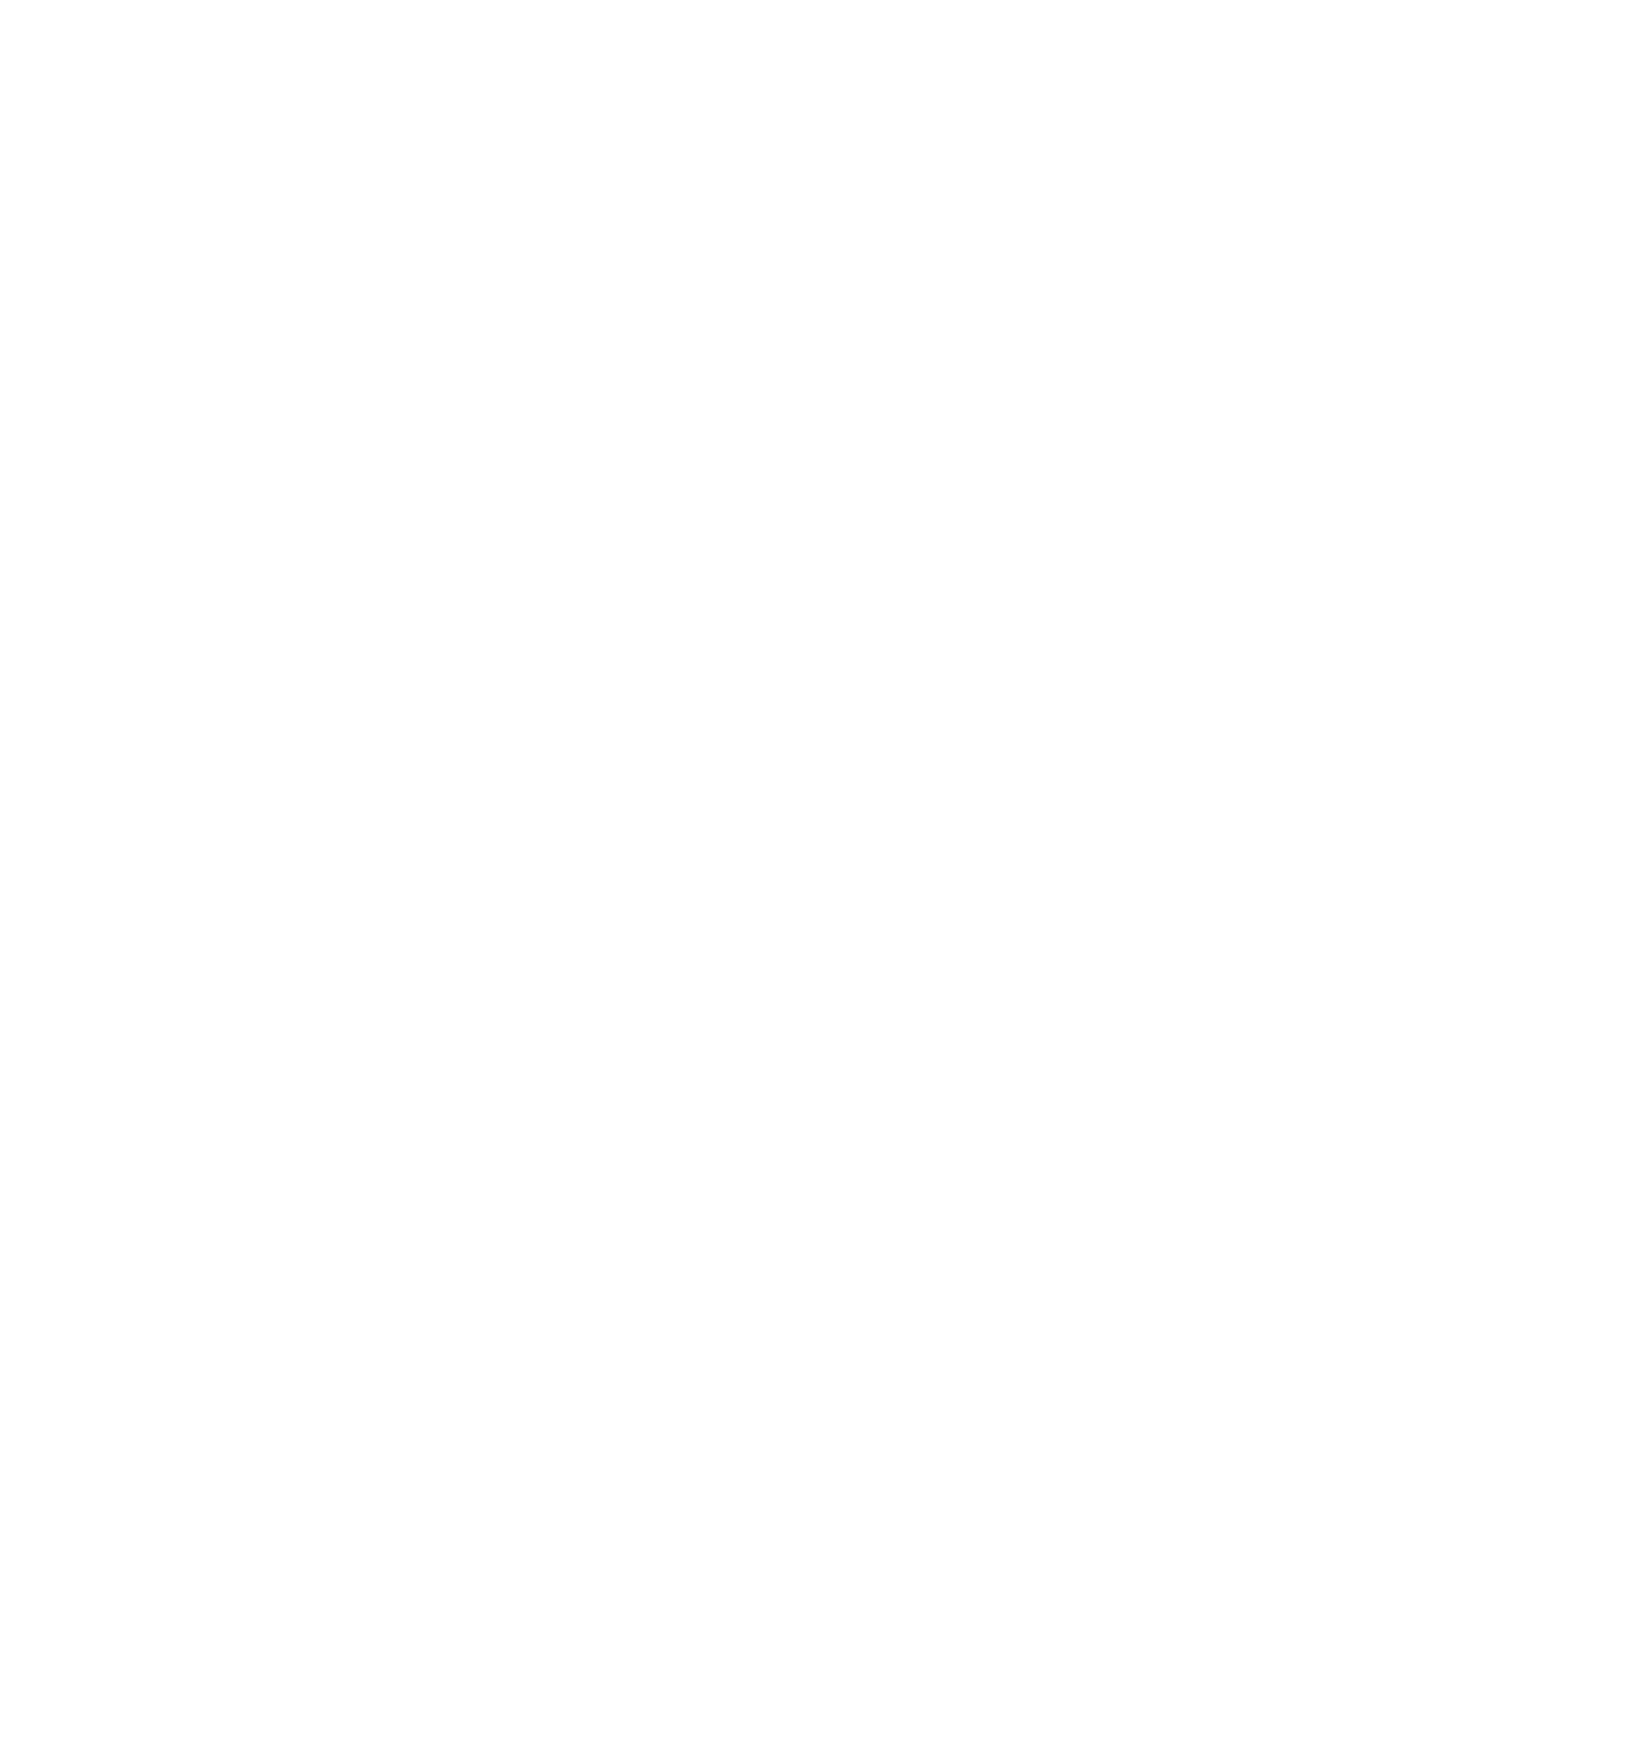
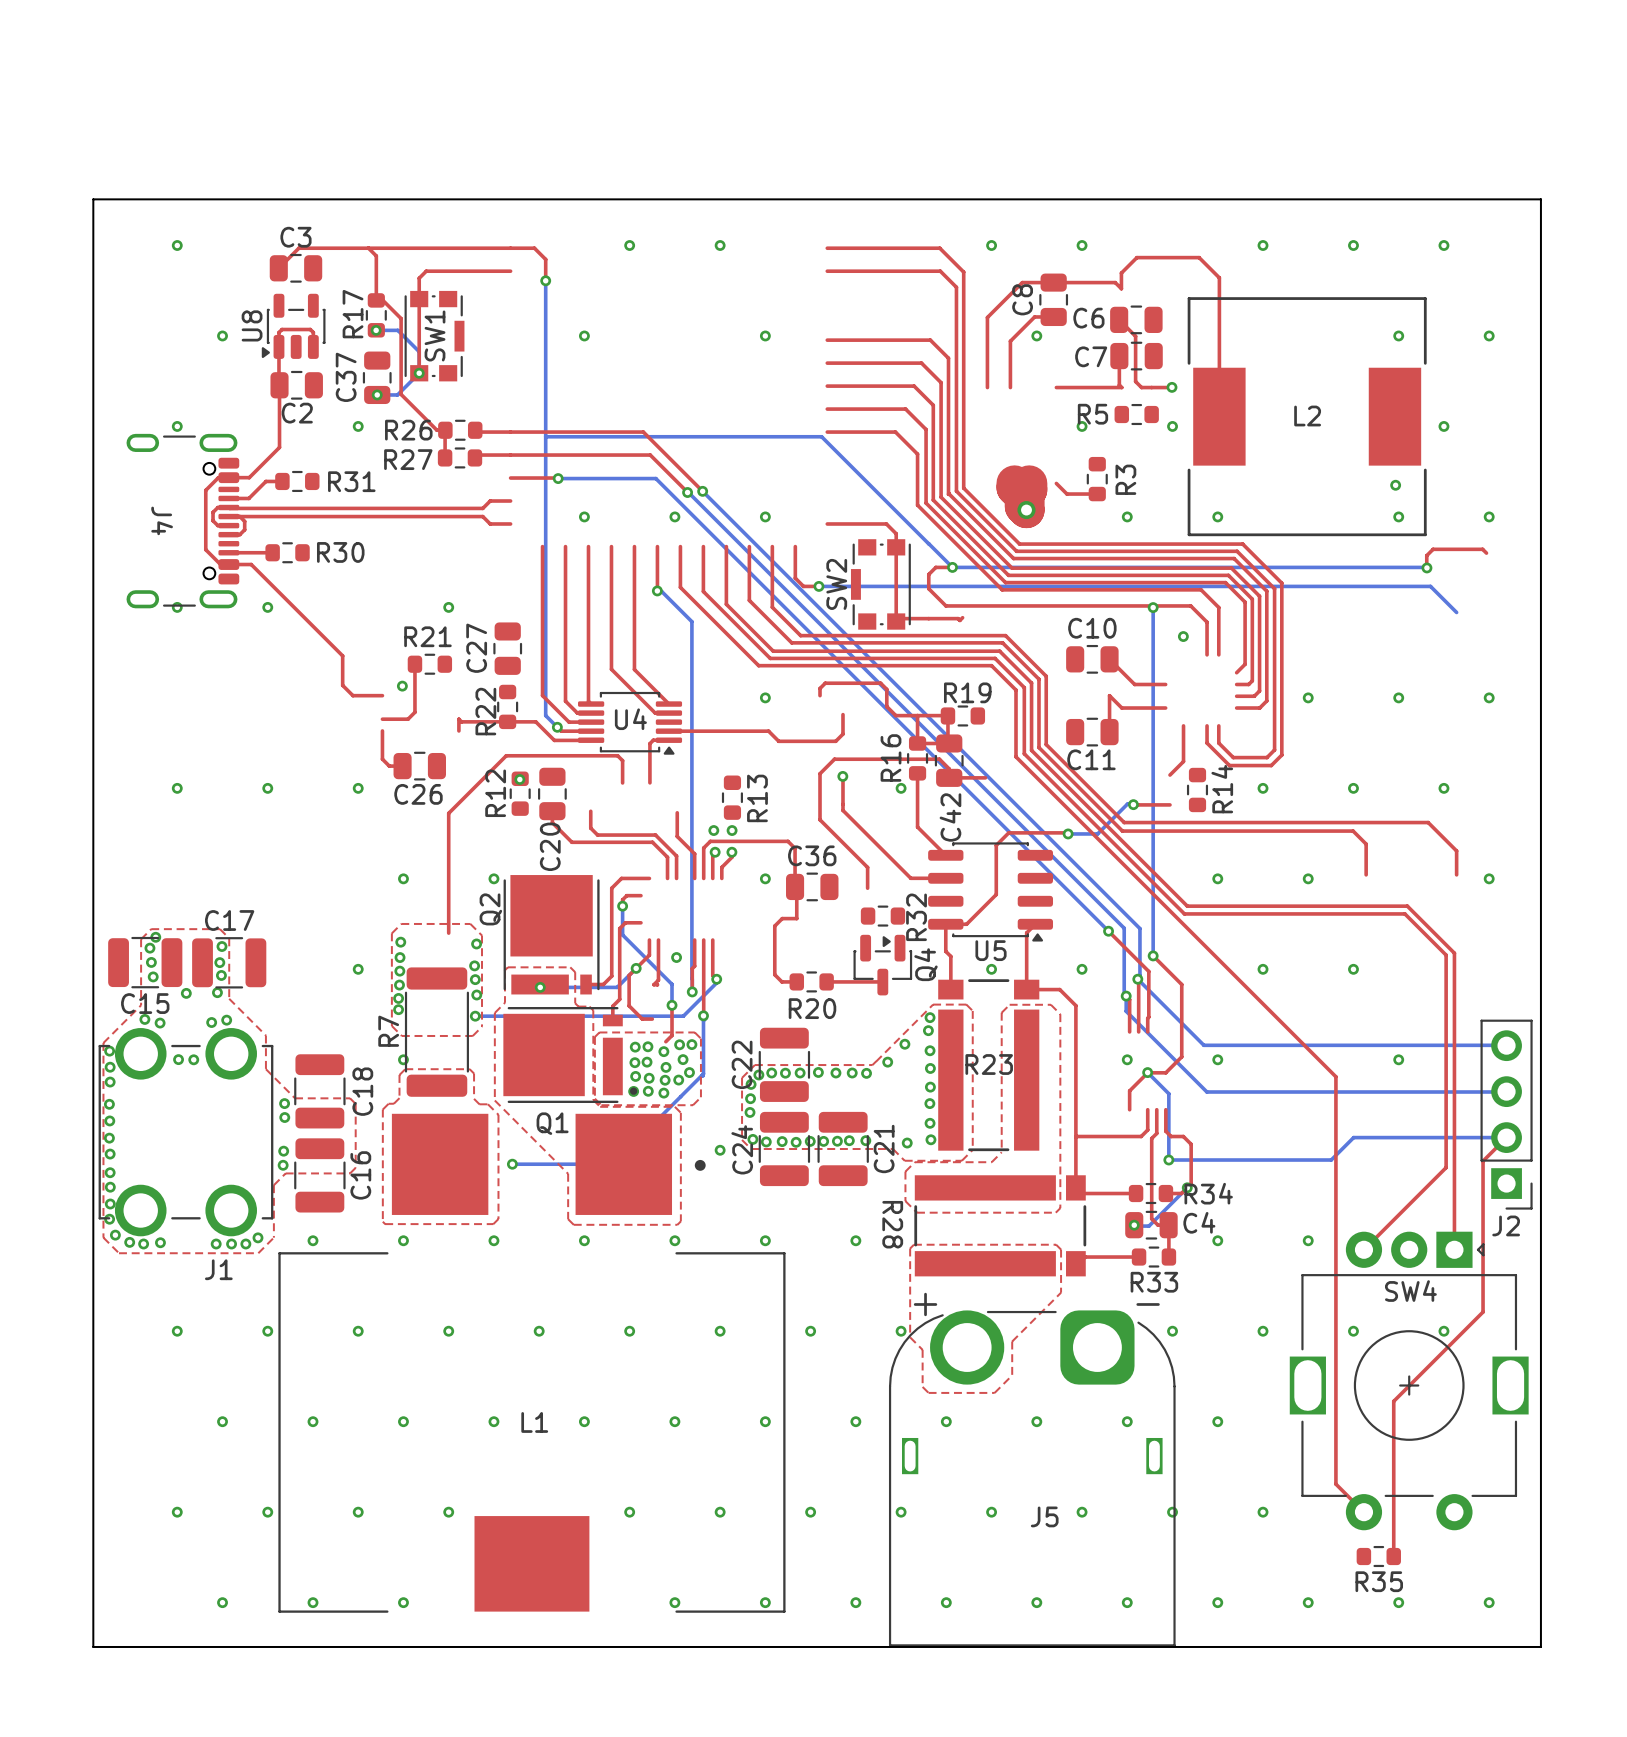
board edge: none -> (93, 199) (1540, 199) (1540, 1646) (93, 1646) (93, 199)
via: none -> (177, 245)
via: none -> (629, 245)
via: none -> (720, 245)
via: none -> (991, 245)
via: none -> (1082, 245)
via: none -> (1263, 245)
via: none -> (1353, 245)
via: none -> (1443, 245)
top track: none -> (368, 248) (376, 255) (376, 300) (382, 300) (401, 318) (401, 394) (436, 430) (445, 430) (445, 457)
top track: none -> (827, 248) (939, 248) (963, 272) (963, 488) (1019, 544) (1242, 544) (1281, 583) (1281, 755) (1271, 765) (1229, 765) (1207, 743) (1207, 725)
top track: none -> (278, 268) (298, 248) (534, 248) (545, 259) (545, 280)
C3: none -> (295, 268)
top track: none -> (510, 271) (426, 271) (419, 278) (419, 373)
top track: none -> (827, 271) (940, 271) (956, 287) (956, 491) (1016, 551) (1237, 551) (1274, 588) (1274, 750) (1266, 757) (1233, 757) (1218, 743) (1218, 725)
bottom track: none -> (545, 280) (545, 715) (559, 729)
via: none -> (545, 280)
C8: none -> (1053, 299)
R17: none -> (376, 315)
top track: none -> (1053, 316) (1034, 316) (1010, 341) (1010, 387)
top track: none -> (1119, 319) (1135, 336) (1135, 381) (1141, 387) (1171, 387)
C6: none -> (1136, 319)
U8: none -> (293, 326)
bottom track: none -> (376, 330) (397, 330) (419, 351) (419, 373) (397, 394) (377, 394)
via: none -> (376, 330)
via: none -> (222, 335)
via: none -> (584, 335)
via: none -> (765, 335)
via: none -> (1036, 335)
via: none -> (1398, 335)
via: none -> (1489, 335)
SW1: none -> (434, 336)
top track: none -> (827, 340) (930, 340) (948, 358) (948, 494) (1013, 558) (1234, 558) (1266, 591) (1266, 700) (1259, 708) (1236, 708)
top track: none -> (313, 346) (313, 332) (310, 329) (282, 329) (278, 332) (279, 447) (249, 477) (218, 477) (205, 490) (205, 549) (220, 564) (251, 564) (342, 655) (342, 685) (352, 695) (382, 695)
top track: none -> (1119, 356) (1119, 385) (1121, 387) (1056, 387)
C7: none -> (1136, 356)
top track: none -> (827, 363) (921, 363) (941, 382) (941, 497) (1012, 568) (1231, 568) (1259, 596) (1259, 691) (1254, 696) (1236, 696)
via: none -> (419, 373)
C37: none -> (377, 377)
C2: none -> (296, 385)
top track: none -> (827, 386) (914, 386) (933, 405) (933, 500) (1008, 575) (1228, 575) (1252, 599) (1252, 680) (1248, 684) (1236, 684)
top track: none -> (987, 387) (987, 317) (1022, 282) (1115, 282) (1121, 288) (1121, 273) (1136, 257) (1199, 257) (1219, 277) (1219, 416)
via: none -> (1171, 387)
via: none -> (377, 394)
top track: none -> (827, 409) (905, 409) (926, 429) (926, 503) (1005, 582) (1225, 582) (1245, 602) (1245, 664) (1236, 672)
R5: none -> (1136, 414)
L2: none -> (1307, 416)
via: none -> (177, 426)
via: none -> (358, 426)
via: none -> (1082, 426)
via: none -> (1172, 426)
via: none -> (1443, 426)
R26: none -> (460, 430)
top track: none -> (475, 430) (477, 432) (643, 432) (702, 491)
top track: none -> (827, 432) (895, 432) (917, 454) (917, 505) (1002, 589) (1201, 589) (1218, 607) (1218, 654)
bottom track: none -> (545, 436) (821, 436) (952, 567) (1427, 567)
R27: none -> (460, 457)
top track: none -> (474, 457) (477, 455) (650, 455) (687, 492)
top track: none -> (510, 478) (558, 478)
bottom track: none -> (558, 478) (655, 478) (1108, 931)
via: none -> (558, 478)
R3: none -> (1097, 479)
top track: none -> (282, 481) (265, 481) (248, 498) (228, 498)
R31: none -> (297, 481)
top track: none -> (1014, 483) (1014, 487) (1022, 495) (1022, 506) (1026, 510) (1026, 492) (1029, 489) (1029, 483)
top track: none -> (1056, 483) (1066, 494) (1097, 494)
via: none -> (1395, 485)
bottom track: none -> (702, 491) (1139, 928) (1139, 975) (1138, 977)
via: none -> (702, 491)
bottom track: none -> (687, 492) (1124, 928) (1124, 994) (1126, 996) (1126, 1011) (1206, 1092) (1506, 1091)
via: none -> (687, 492)
top track: none -> (510, 501) (490, 501) (482, 508) (217, 507) (213, 512) (213, 520) (217, 525) (228, 525)
via: none -> (1026, 510)
top track: none -> (228, 516) (482, 516) (490, 523) (510, 523)
top track: none -> (239, 516) (244, 521) (244, 529) (239, 534) (228, 534)
via: none -> (584, 516)
via: none -> (674, 516)
via: none -> (765, 516)
via: none -> (1127, 516)
via: none -> (1217, 516)
via: none -> (1398, 516)
via: none -> (1489, 516)
J4: none -> (182, 521)
top track: none -> (827, 523) (886, 523) (896, 533) (896, 621) (899, 618) (958, 618) (959, 620) (962, 617)
top track: none -> (542, 546) (542, 695) (569, 722) (591, 722)
top track: none -> (565, 546) (565, 701) (577, 713) (591, 713)
top track: none -> (588, 546) (588, 701) (591, 704)
top track: none -> (611, 546) (611, 669) (655, 713) (668, 713)
top track: none -> (634, 546) (634, 669) (668, 704)
top track: none -> (657, 546) (657, 590)
top track: none -> (680, 546) (680, 587) (758, 665) (991, 665) (1016, 690) (1016, 756) (1335, 1076) (1335, 1484) (1363, 1512)
top track: none -> (703, 546) (703, 591) (770, 658) (995, 658) (1024, 687) (1024, 753) (1184, 913) (1404, 913) (1446, 955) (1446, 1167) (1363, 1249)
top track: none -> (726, 546) (726, 604) (773, 651) (999, 651) (1031, 683) (1031, 750) (1187, 906) (1407, 906) (1454, 953) (1454, 1249)
top track: none -> (749, 546) (749, 600) (791, 642) (1002, 642) (1038, 679) (1038, 747) (1122, 831) (1353, 831) (1366, 844) (1366, 874)
top track: none -> (772, 546) (772, 607) (800, 635) (1005, 635) (1046, 676) (1046, 744) (1124, 822) (1428, 822) (1456, 850) (1456, 874)
top track: none -> (795, 546) (795, 578) (803, 586) (818, 586)
top track: none -> (228, 552) (272, 552)
R30: none -> (287, 552)
top track: none -> (1486, 553) (1482, 549) (1433, 549) (1426, 555) (1426, 567)
top track: none -> (952, 567) (935, 567) (928, 574) (928, 588) (945, 605) (1190, 605) (1207, 622) (1207, 654)
via: none -> (952, 567)
via: none -> (1426, 567)
SW2: none -> (880, 584)
bottom track: none -> (818, 586) (1430, 586) (1456, 612)
via: none -> (818, 586)
bottom track: none -> (657, 590) (661, 591) (691, 621) (692, 991)
via: none -> (657, 590)
via: none -> (177, 607)
via: none -> (267, 607)
via: none -> (448, 607)
bottom track: none -> (1153, 607) (1153, 955)
via: none -> (1153, 607)
via: none -> (1183, 636)
C27: none -> (507, 648)
C10: none -> (1092, 659)
top track: none -> (1109, 659) (1134, 684) (1165, 684)
top track: none -> (414, 664) (414, 712) (408, 719) (382, 719)
R21: none -> (429, 664)
via: none -> (402, 686)
top track: none -> (820, 695) (820, 688) (825, 683) (880, 683) (886, 689) (886, 706) (895, 715) (947, 715) (949, 743) (919, 743) (917, 741) (917, 715)
via: none -> (765, 697)
via: none -> (1308, 697)
via: none -> (1398, 697)
via: none -> (1489, 697)
R22: none -> (507, 706)
top track: none -> (1165, 708) (1121, 708) (1109, 695) (1109, 732)
top track: none -> (842, 714) (842, 734) (835, 741) (778, 741) (768, 731) (668, 731)
R19: none -> (962, 715)
U4: none -> (630, 723)
top track: none -> (1183, 725) (1183, 761) (1169, 775)
top track: none -> (557, 727) (561, 731) (591, 731)
via: none -> (557, 727)
top track: none -> (382, 730) (382, 759) (389, 766) (402, 766)
top track: none -> (458, 730) (458, 719) (461, 721) (535, 721) (554, 740) (590, 740)
C11: none -> (1092, 732)
top track: none -> (668, 740) (653, 740) (649, 743) (649, 782)
R16: none -> (917, 758)
C42: none -> (949, 760)
C26: none -> (419, 766)
top track: none -> (917, 773) (917, 827) (945, 855)
top track: none -> (842, 776) (842, 810) (910, 878) (945, 878)
via: none -> (842, 776)
top track: none -> (985, 777) (949, 777) (949, 768) (939, 759) (834, 759) (820, 773) (820, 819) (867, 867) (867, 888)
via: none -> (519, 779)
top track: none -> (622, 782) (622, 760) (617, 755) (506, 755) (448, 813) (448, 933)
via: none -> (177, 788)
via: none -> (267, 788)
via: none -> (358, 788)
via: none -> (901, 788)
via: none -> (1263, 788)
via: none -> (1353, 788)
via: none -> (1443, 788)
R14: none -> (1197, 789)
R12: none -> (520, 793)
C20: none -> (552, 793)
R13: none -> (732, 797)
top track: none -> (1133, 804) (1169, 804)
bottom track: none -> (1133, 804) (1127, 804) (1097, 833) (1068, 833)
via: none -> (1133, 804)
top track: none -> (556, 809) (552, 811) (552, 822) (571, 842) (652, 842) (667, 857) (667, 878)
top track: none -> (590, 811) (590, 828) (597, 835) (655, 835) (676, 856) (676, 878)
top track: none -> (677, 812) (677, 836) (694, 853) (694, 878)
via: none -> (713, 830)
via: none -> (732, 830)
top track: none -> (1068, 831) (1008, 832) (996, 845) (996, 894) (966, 924) (945, 924) (945, 951) (950, 956) (950, 989)
via: none -> (1068, 833)
top track: none -> (715, 852) (712, 856) (712, 878)
via: none -> (715, 852)
top track: none -> (731, 852) (731, 857) (721, 867) (721, 878)
via: none -> (731, 852)
via: none -> (403, 878)
via: none -> (493, 878)
top track: none -> (649, 878) (621, 878) (611, 888) (611, 976) (603, 984) (586, 984)
top track: none -> (703, 878) (703, 848) (710, 841) (788, 841) (795, 848) (796, 918) (782, 918) (774, 926) (774, 974) (781, 981) (796, 981)
via: none -> (765, 878)
via: none -> (1217, 878)
via: none -> (1308, 878)
via: none -> (1489, 878)
C36: none -> (812, 886)
U5: none -> (990, 891)
top track: none -> (640, 895) (626, 895) (622, 899) (622, 906) (620, 906)
bottom track: none -> (622, 906) (622, 934) (672, 984) (672, 1005)
via: none -> (622, 906)
R32: none -> (883, 916)
top track: none -> (640, 922) (625, 922) (619, 928) (619, 999) (612, 1006) (612, 1020)
top zone outline: none -> (401, 923) (470, 923) (482, 935) (482, 1026) (472, 1035) (401, 1035) (391, 1026) (391, 933) (401, 923)
top track: none -> (1035, 924) (1026, 932) (1026, 989) (1059, 989) (1075, 1005) (1075, 1187) (1081, 1193) (1136, 1193)
top zone outline: none -> (151, 929) (141, 939) (141, 1005) (103, 1042) (103, 1237) (119, 1253) (258, 1253) (273, 1237) (273, 1185) (285, 1173) (350, 1173) (355, 1167) (355, 1103) (350, 1098) (295, 1098) (265, 1069) (265, 1035) (229, 998) (229, 938) (219, 929) (151, 929)
top track: none -> (1108, 931) (1148, 971) (1147, 1031)
via: none -> (1108, 931)
Q2: none -> (551, 934)
via: none -> (155, 937)
top track: none -> (649, 940) (649, 955) (629, 975) (629, 1005) (642, 1019) (652, 1019)
top track: none -> (658, 940) (658, 980) (653, 984) (657, 984)
top track: none -> (694, 940) (692, 991)
top track: none -> (703, 940) (703, 1015)
top track: none -> (712, 940) (712, 975) (716, 979)
via: none -> (400, 942)
via: none -> (476, 943)
via: none -> (221, 946)
via: none -> (149, 948)
top track: none -> (1153, 955) (1181, 984) (1181, 1056) (1165, 1072) (1147, 1072) (1129, 1090) (1129, 1109)
via: none -> (1153, 955)
via: none -> (400, 957)
via: none -> (676, 957)
C15: none -> (145, 962)
via: none -> (151, 962)
via: none -> (219, 962)
C17: none -> (229, 962)
via: none -> (474, 965)
Q4: none -> (882, 965)
top zone outline: none -> (507, 967) (570, 967) (575, 972) (575, 1003) (578, 1006) (589, 1006) (593, 1010) (593, 1099) (600, 1106) (674, 1106) (680, 1112) (680, 1221) (677, 1224) (573, 1224) (568, 1219) (568, 1173) (494, 1100) (494, 1012) (504, 1002) (504, 970) (507, 967)
bottom track: none -> (636, 968) (617, 987) (540, 987)
via: none -> (636, 968)
via: none -> (358, 969)
via: none -> (991, 969)
via: none -> (1082, 969)
via: none -> (1263, 969)
via: none -> (1353, 969)
via: none -> (399, 971)
via: none -> (221, 975)
via: none -> (153, 976)
via: none -> (475, 979)
bottom track: none -> (716, 979) (716, 982) (683, 1016) (475, 1016)
via: none -> (716, 979)
top track: none -> (1137, 979) (1138, 1031)
bottom track: none -> (1137, 979) (1203, 1045) (1506, 1045)
via: none -> (1137, 979)
R20: none -> (811, 981)
top track: none -> (826, 981) (882, 981)
via: none -> (399, 985)
via: none -> (540, 987)
via: none -> (692, 991)
via: none -> (217, 992)
via: none -> (186, 993)
via: none -> (476, 995)
top track: none -> (1126, 996) (1129, 999) (1129, 1031)
via: none -> (1126, 996)
via: none -> (398, 998)
top zone outline: none -> (1009, 1004) (1050, 1004) (1060, 1014) (1060, 1208) (1055, 1212) (917, 1212) (905, 1201) (905, 1171) (914, 1162) (991, 1162) (1001, 1152) (1001, 1012) (1009, 1004)
top track: none -> (672, 1005) (672, 1035) (665, 1041)
via: none -> (672, 1005)
via: none -> (398, 1009)
via: none -> (703, 1015)
via: none -> (475, 1016)
via: none -> (930, 1017)
bottom track: none -> (705, 1018) (703, 1020) (703, 1075) (613, 1164) (512, 1164)
via: none -> (144, 1019)
via: none -> (226, 1020)
via: none -> (211, 1022)
via: none -> (160, 1023)
via: none -> (928, 1030)
R7: none -> (436, 1032)
top zone outline: none -> (599, 1032) (694, 1032) (700, 1038) (700, 1097) (693, 1105) (601, 1105) (594, 1098) (594, 1036) (599, 1032)
via: none -> (679, 1044)
via: none -> (691, 1044)
via: none -> (904, 1044)
via: none -> (647, 1046)
via: none -> (635, 1047)
via: none -> (930, 1050)
via: none -> (109, 1051)
via: none -> (663, 1051)
Q1: none -> (570, 1054)
via: none -> (178, 1059)
via: none -> (193, 1059)
via: none -> (403, 1059)
via: none -> (683, 1059)
via: none -> (1127, 1059)
via: none -> (1217, 1059)
via: none -> (1398, 1059)
top zone outline: none -> (876, 1061) (872, 1065) (754, 1065) (742, 1077) (742, 1139) (751, 1149) (892, 1149) (904, 1160) (961, 1160) (972, 1149) (972, 1010) (966, 1004) (933, 1004) (876, 1061)
via: none -> (634, 1062)
via: none -> (647, 1062)
via: none -> (887, 1062)
C22: none -> (784, 1064)
R23: none -> (988, 1065)
via: none -> (110, 1067)
via: none -> (666, 1067)
via: none -> (930, 1068)
via: none -> (689, 1072)
via: none -> (818, 1072)
bottom track: none -> (1147, 1072) (1168, 1093) (1168, 1160) (1331, 1160) (1353, 1137) (1506, 1137)
via: none -> (1147, 1072)
via: none -> (771, 1073)
via: none -> (785, 1073)
via: none -> (800, 1073)
via: none -> (835, 1073)
via: none -> (852, 1073)
via: none -> (866, 1073)
via: none -> (758, 1074)
via: none -> (635, 1076)
via: none -> (649, 1078)
via: none -> (665, 1080)
via: none -> (678, 1080)
via: none -> (110, 1082)
via: none -> (751, 1084)
via: none -> (930, 1087)
C18: none -> (319, 1091)
via: none -> (633, 1091)
via: none -> (648, 1091)
via: none -> (663, 1093)
via: none -> (750, 1098)
via: none -> (284, 1103)
via: none -> (929, 1103)
via: none -> (109, 1104)
top track: none -> (1147, 1109) (1147, 1130) (1141, 1136) (1075, 1137)
top track: none -> (1156, 1109) (1156, 1133) (1151, 1138) (1151, 1218) (1158, 1225) (1168, 1225) (1168, 1257)
top track: none -> (1165, 1109) (1165, 1131) (1171, 1136) (1183, 1136) (1191, 1144) (1191, 1183) (1181, 1193) (1165, 1193)
via: none -> (750, 1112)
J2: none -> (1506, 1114)
via: none -> (284, 1117)
via: none -> (109, 1120)
via: none -> (930, 1123)
J1: none -> (185, 1132)
top track: none -> (1506, 1137) (1483, 1161) (1483, 1312) (1393, 1401) (1393, 1556)
via: none -> (109, 1138)
via: none -> (752, 1139)
via: none -> (930, 1139)
via: none -> (849, 1140)
via: none -> (865, 1140)
via: none -> (766, 1141)
via: none -> (782, 1141)
via: none -> (810, 1141)
via: none -> (823, 1141)
via: none -> (837, 1141)
via: none -> (796, 1142)
via: none -> (907, 1143)
C24: none -> (784, 1148)
C21: none -> (843, 1148)
via: none -> (720, 1150)
via: none -> (283, 1151)
via: none -> (110, 1154)
via: none -> (1168, 1160)
via: none -> (512, 1164)
via: none -> (283, 1165)
via: none -> (110, 1172)
C16: none -> (319, 1175)
via: none -> (110, 1187)
bottom track: none -> (1187, 1187) (1149, 1226) (1134, 1225)
via: none -> (1187, 1187)
R34: none -> (1150, 1193)
via: none -> (110, 1204)
via: none -> (109, 1219)
top zone outline: none -> (385, 1224) (493, 1224) (498, 1219) (498, 1114) (487, 1104) (479, 1104) (474, 1098) (474, 1073) (469, 1069) (405, 1069) (399, 1074) (399, 1098) (393, 1103) (388, 1103) (382, 1109) (382, 1221) (385, 1224)
R28: none -> (1000, 1225)
via: none -> (1134, 1225)
C4: none -> (1151, 1225)
via: none -> (115, 1235)
via: none -> (257, 1237)
via: none -> (312, 1240)
via: none -> (403, 1240)
via: none -> (493, 1240)
via: none -> (584, 1240)
via: none -> (674, 1240)
via: none -> (765, 1240)
via: none -> (855, 1240)
via: none -> (1217, 1240)
via: none -> (1308, 1240)
via: none -> (129, 1242)
via: none -> (160, 1242)
via: none -> (143, 1244)
via: none -> (216, 1244)
via: none -> (231, 1244)
via: none -> (245, 1244)
top zone outline: none -> (913, 1244) (1056, 1244) (1061, 1249) (1061, 1292) (1012, 1341) (1012, 1375) (994, 1392) (928, 1392) (922, 1386) (922, 1349) (910, 1337) (910, 1248) (913, 1244)
top track: none -> (1139, 1257) (1085, 1257) (1076, 1266)
R33: none -> (1153, 1257)
via: none -> (177, 1331)
via: none -> (267, 1331)
via: none -> (358, 1331)
via: none -> (448, 1331)
via: none -> (539, 1331)
via: none -> (629, 1331)
via: none -> (720, 1331)
via: none -> (810, 1331)
via: none -> (901, 1331)
via: none -> (1172, 1331)
via: none -> (1263, 1331)
via: none -> (1353, 1331)
via: none -> (1443, 1331)
L1: none -> (531, 1363)
SW4: none -> (1409, 1380)
via: none -> (222, 1421)
via: none -> (312, 1421)
via: none -> (403, 1421)
via: none -> (493, 1421)
via: none -> (584, 1421)
via: none -> (674, 1421)
via: none -> (765, 1421)
via: none -> (855, 1421)
via: none -> (946, 1421)
via: none -> (1036, 1421)
via: none -> (1127, 1421)
via: none -> (1217, 1421)
J5: none -> (1032, 1478)
via: none -> (177, 1512)
via: none -> (267, 1512)
via: none -> (358, 1512)
via: none -> (448, 1512)
via: none -> (629, 1512)
via: none -> (720, 1512)
via: none -> (810, 1512)
via: none -> (901, 1512)
via: none -> (991, 1512)
via: none -> (1082, 1512)
via: none -> (1172, 1512)
via: none -> (1263, 1512)
R35: none -> (1378, 1556)
via: none -> (222, 1602)
via: none -> (312, 1602)
via: none -> (403, 1602)
via: none -> (674, 1602)
via: none -> (765, 1602)
via: none -> (855, 1602)
via: none -> (946, 1602)
via: none -> (1036, 1602)
via: none -> (1127, 1602)
via: none -> (1217, 1602)
via: none -> (1308, 1602)
via: none -> (1398, 1602)
via: none -> (1489, 1602)

